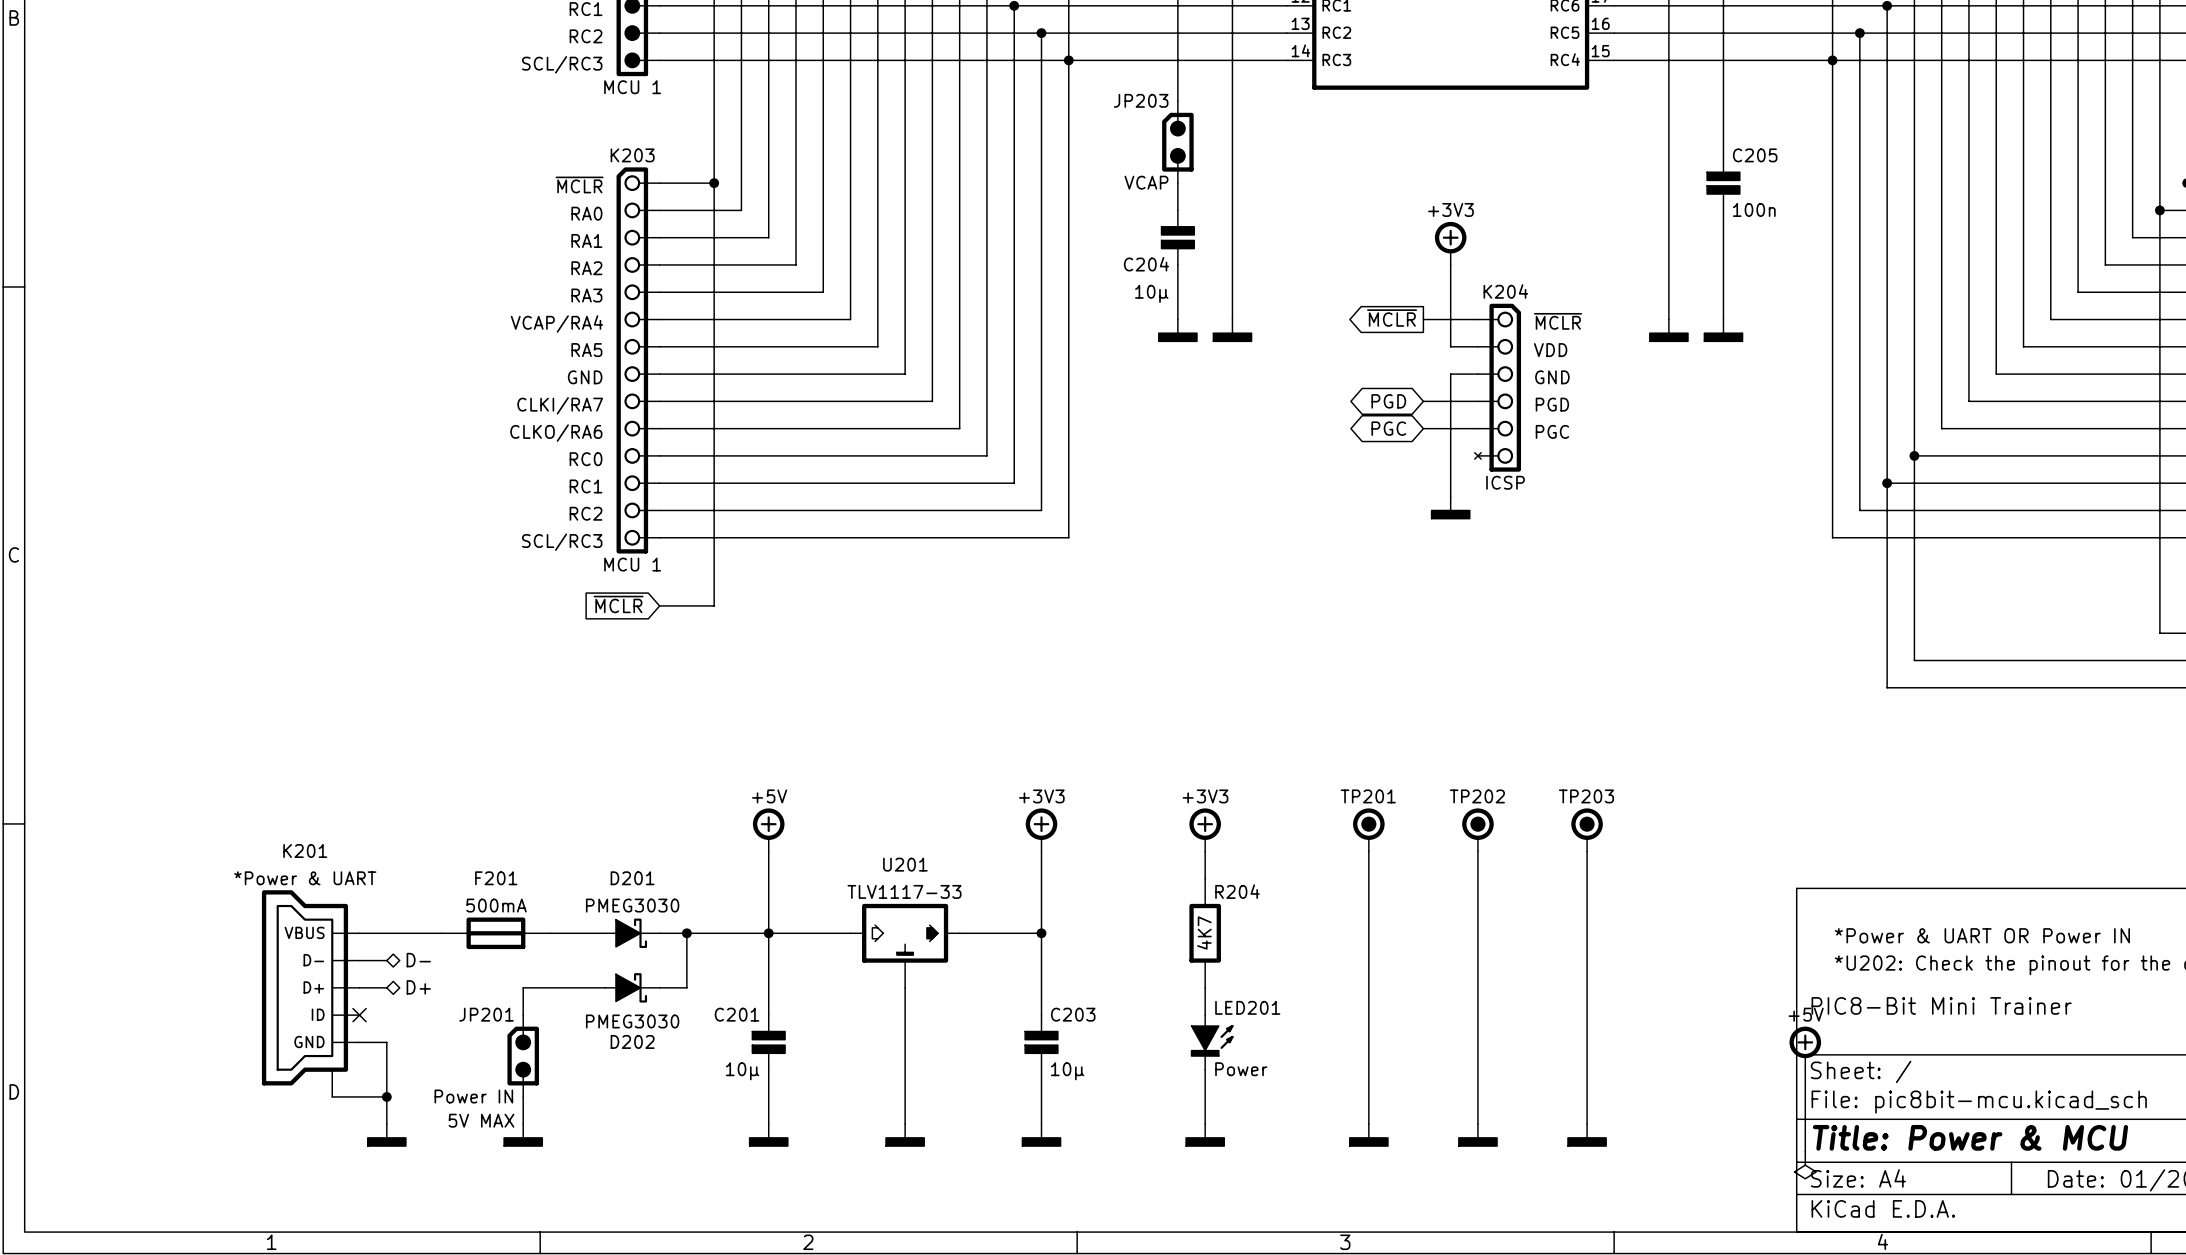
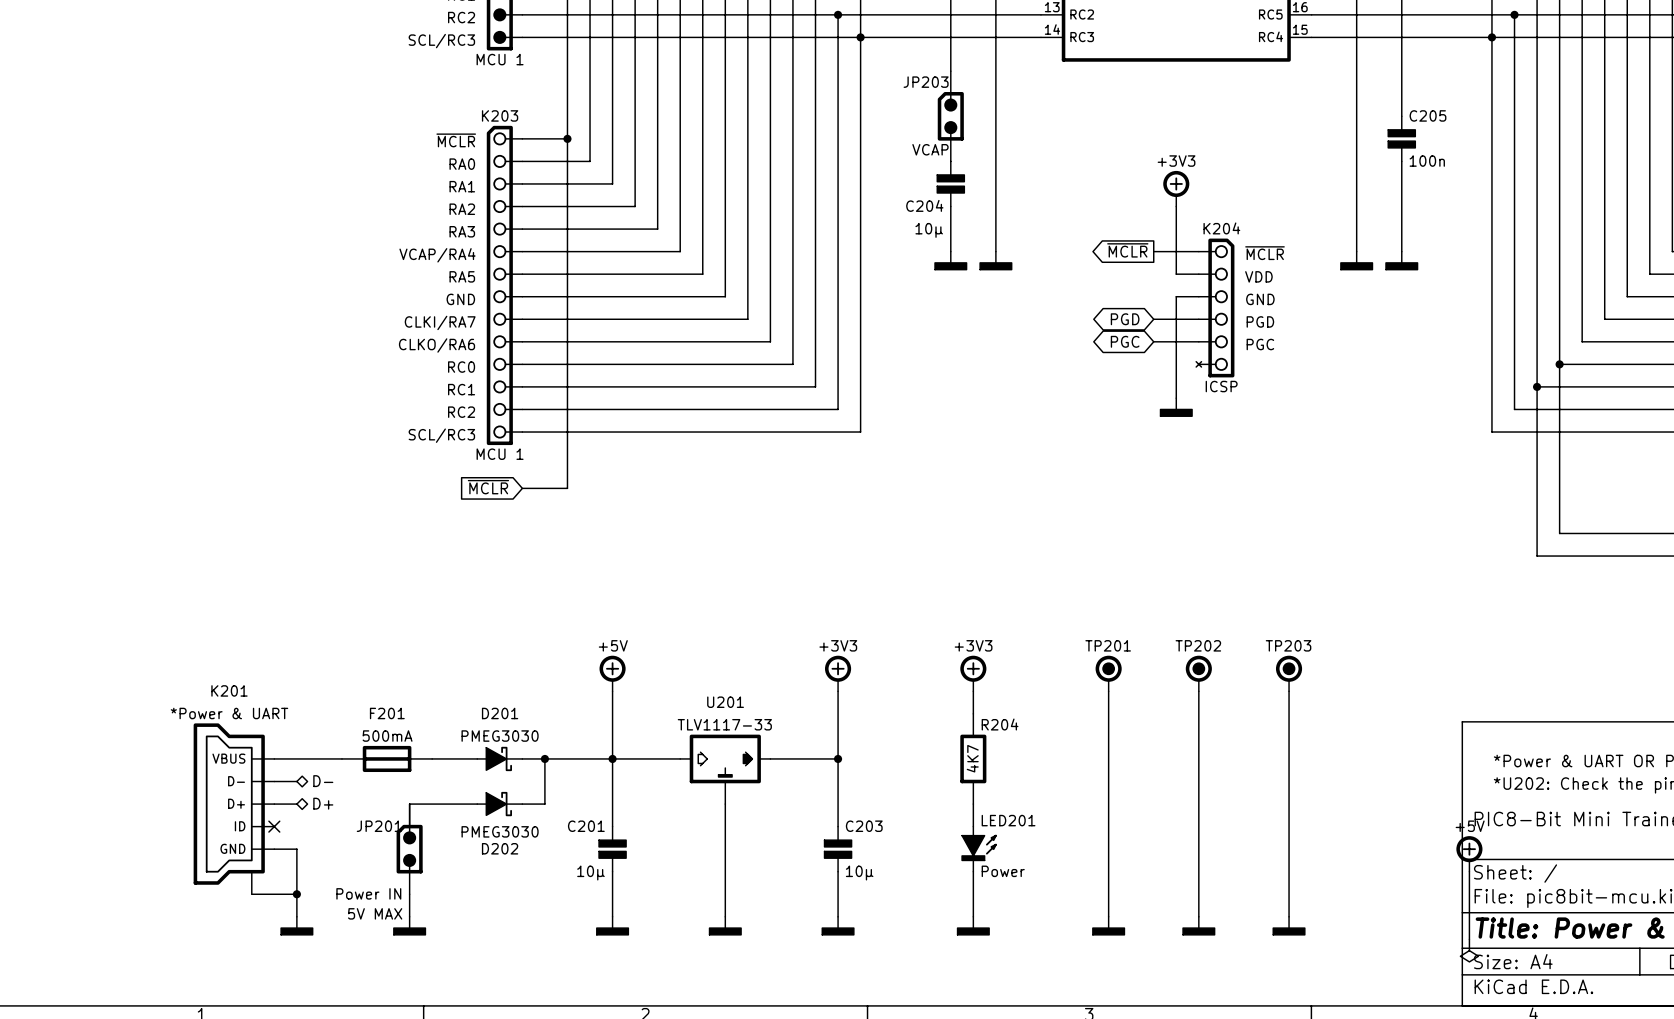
JP203 symbol: [1162, 101, 1194, 184] -> [937, 71, 964, 162]
JP201 symbol: [507, 1015, 540, 1097] -> [396, 804, 423, 895]

